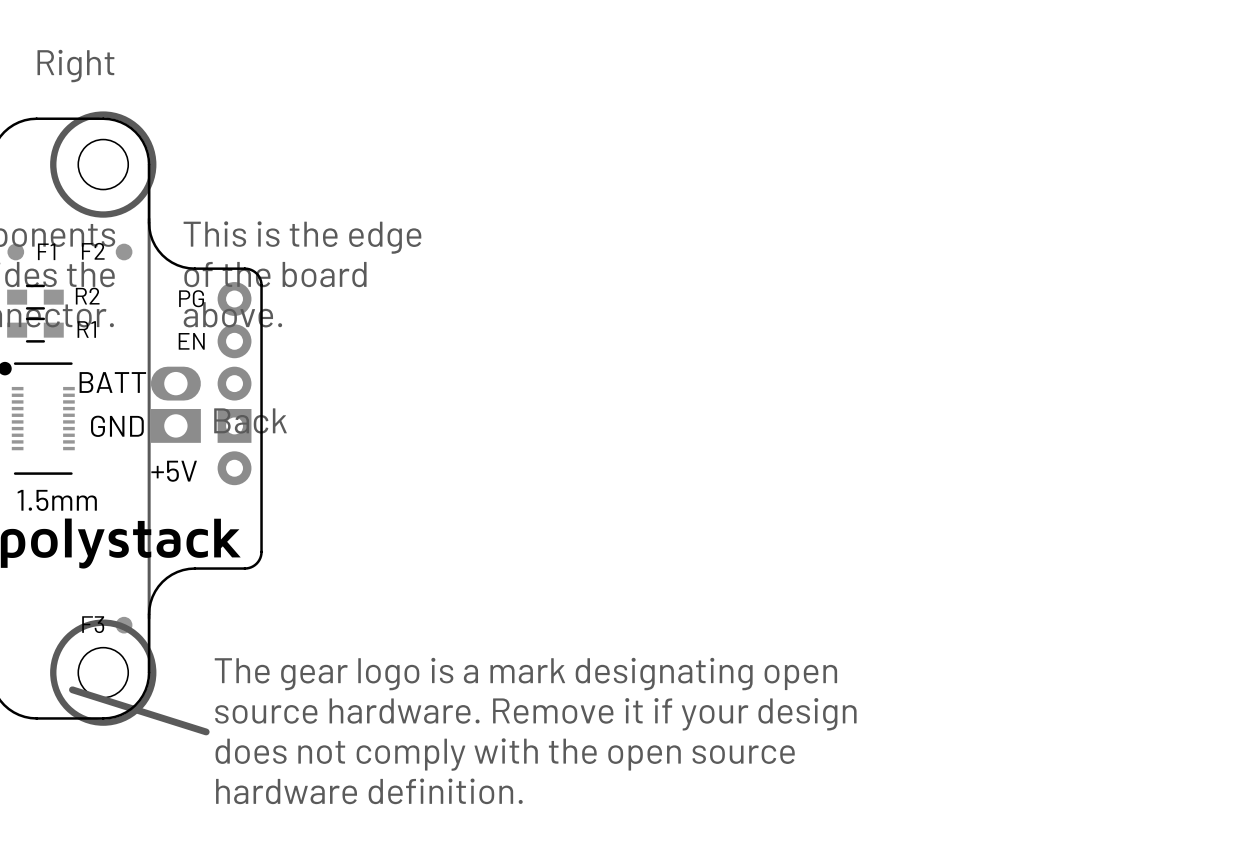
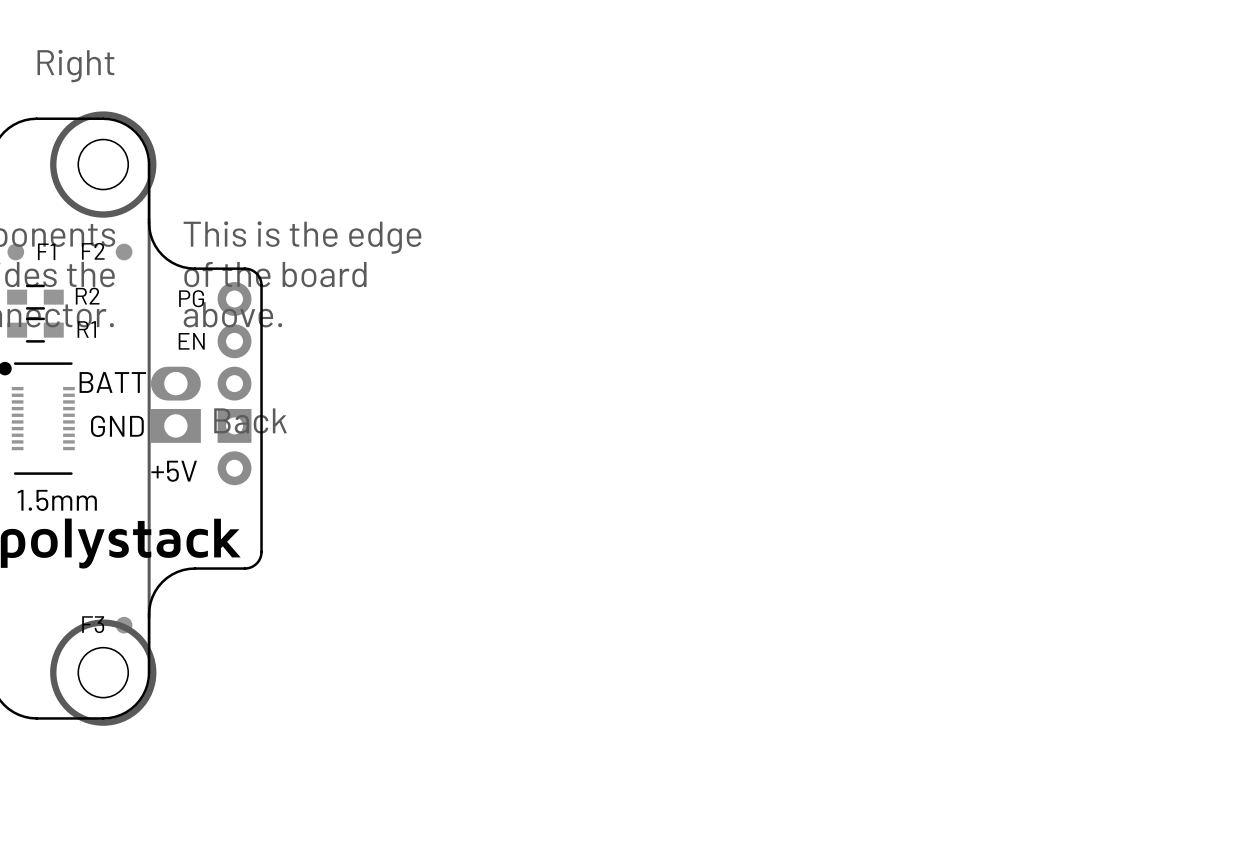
text: The gear logo is a mark designating open (525, 674) -> none
line: (72, 689) (206, 731) -> none
text: source hardware. Remove it if your design (535, 714) -> none
text: does not comply with the open source (505, 754) -> none
text: hardware definition. (369, 791) -> none

